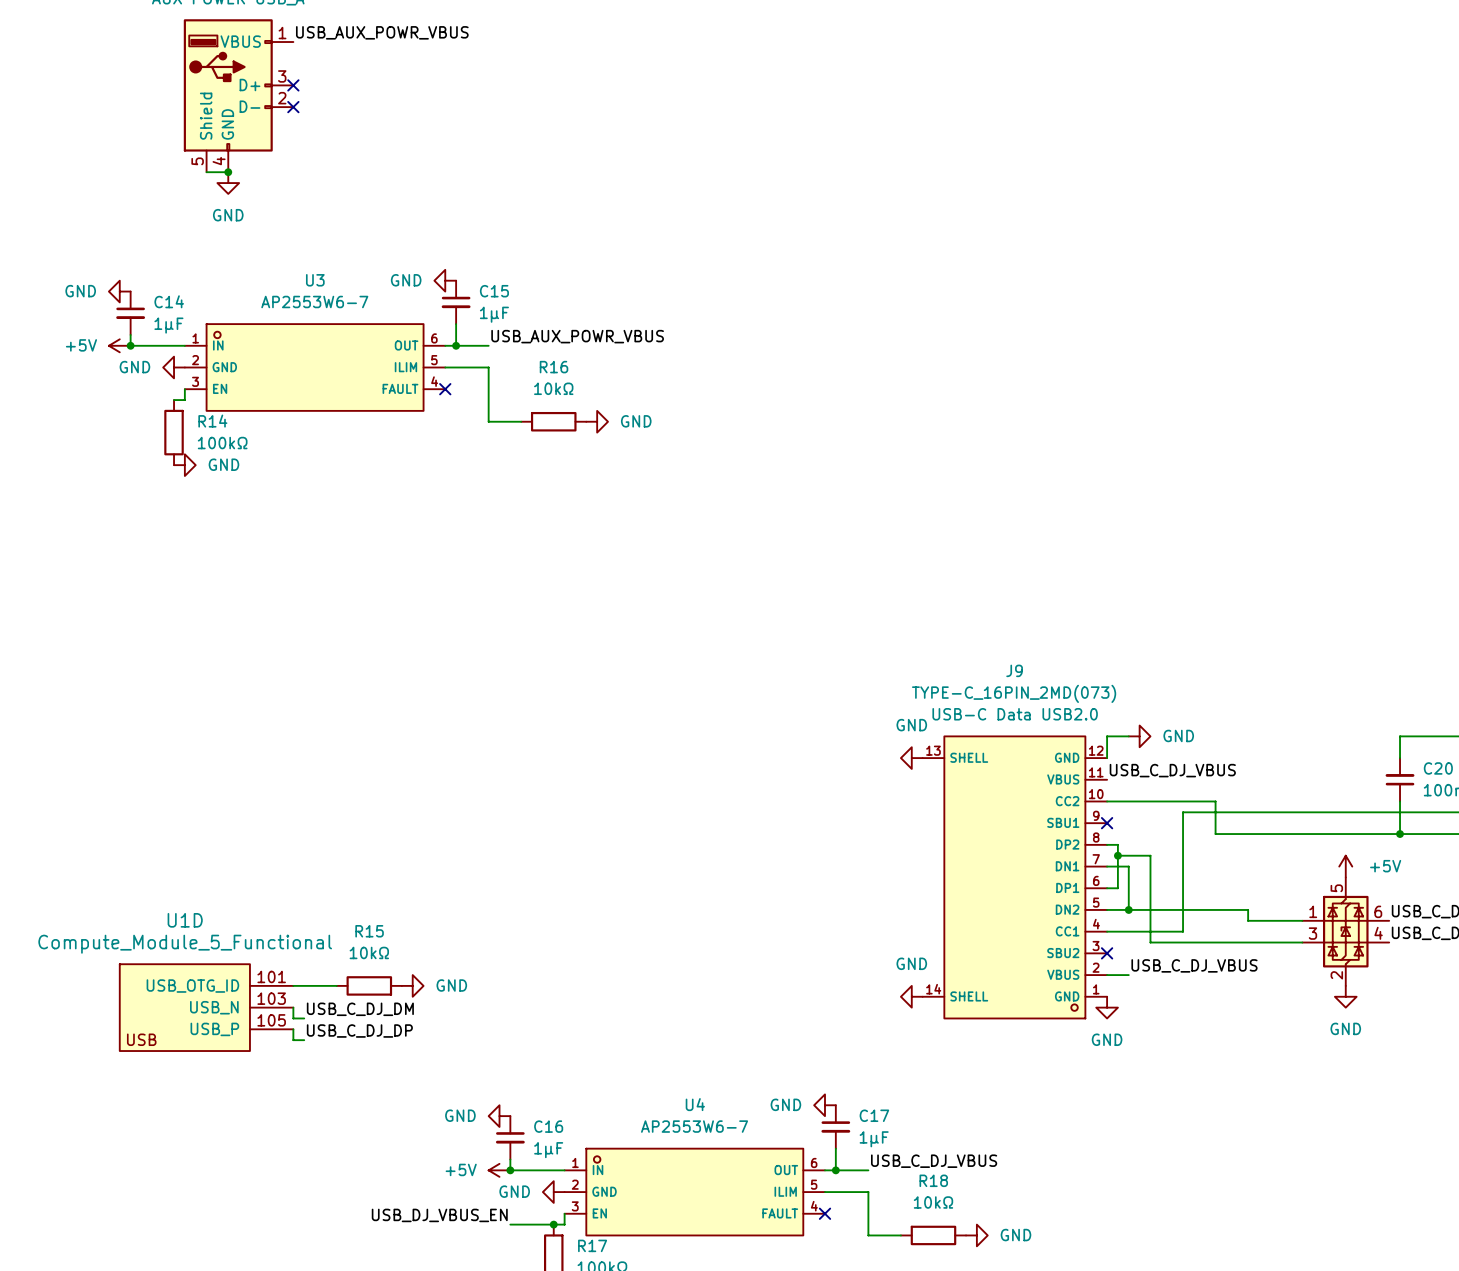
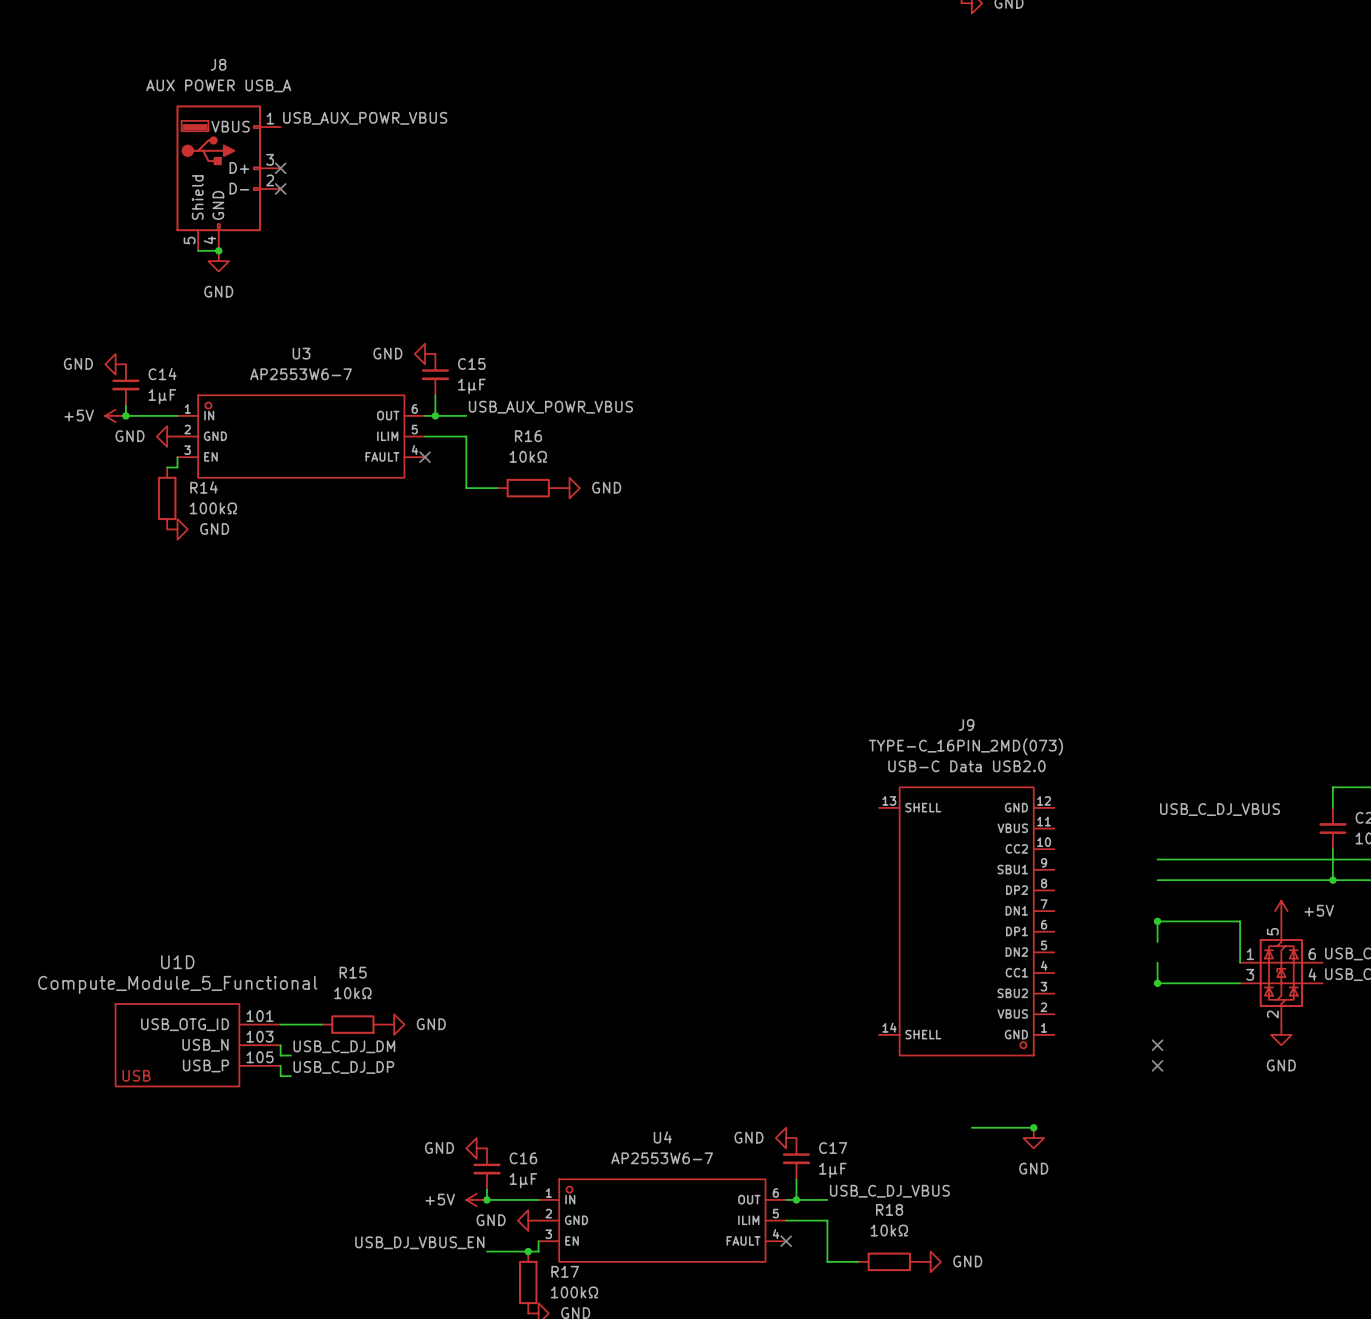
wire: (1128, 736) (1107, 736) (1107, 758) -> none
power symbol: GND (1139, 736) -> none
power symbol: GND (911, 758) -> none
label position: USB_C_DJ_VBUS (1172, 770) -> USB_C_DJ_VBUS (1220, 809)
wire: (1107, 801) (1215, 801) (1215, 834) -> none
wire: (1215, 812) (1183, 812) (1183, 931) (1107, 931) -> none
no-connect mark: (1107, 823) -> none
wire: (1107, 844) (1117, 844) (1117, 888) (1107, 888) -> none
wire: (1117, 855) (1150, 855) (1150, 942) (1215, 942) -> (1157, 962) (1157, 983)
junction: (1117, 855) -> none
wire: (1107, 866) (1128, 866) (1128, 909) -> none
junction: none -> (1157, 921)
wire: (1107, 909) (1248, 909) (1248, 920) (1302, 920) -> (1157, 942) (1157, 921) (1240, 921) (1240, 962)
junction: (1128, 909) -> none
junction: none -> (1157, 983)
no-connect mark: (1107, 953) -> none
label: USB_C_DJ_VBUS (1194, 965) -> none
wire: (1107, 975) (1128, 975) -> none
power symbol: GND (911, 996) -> none
power symbol position: GND (1107, 1007) -> GND (1033, 1138)
no-connect mark: none -> (1157, 1045)
no-connect mark: none -> (1157, 1065)
wire: none -> (971, 1127) (1033, 1127)
junction: none -> (1033, 1127)

